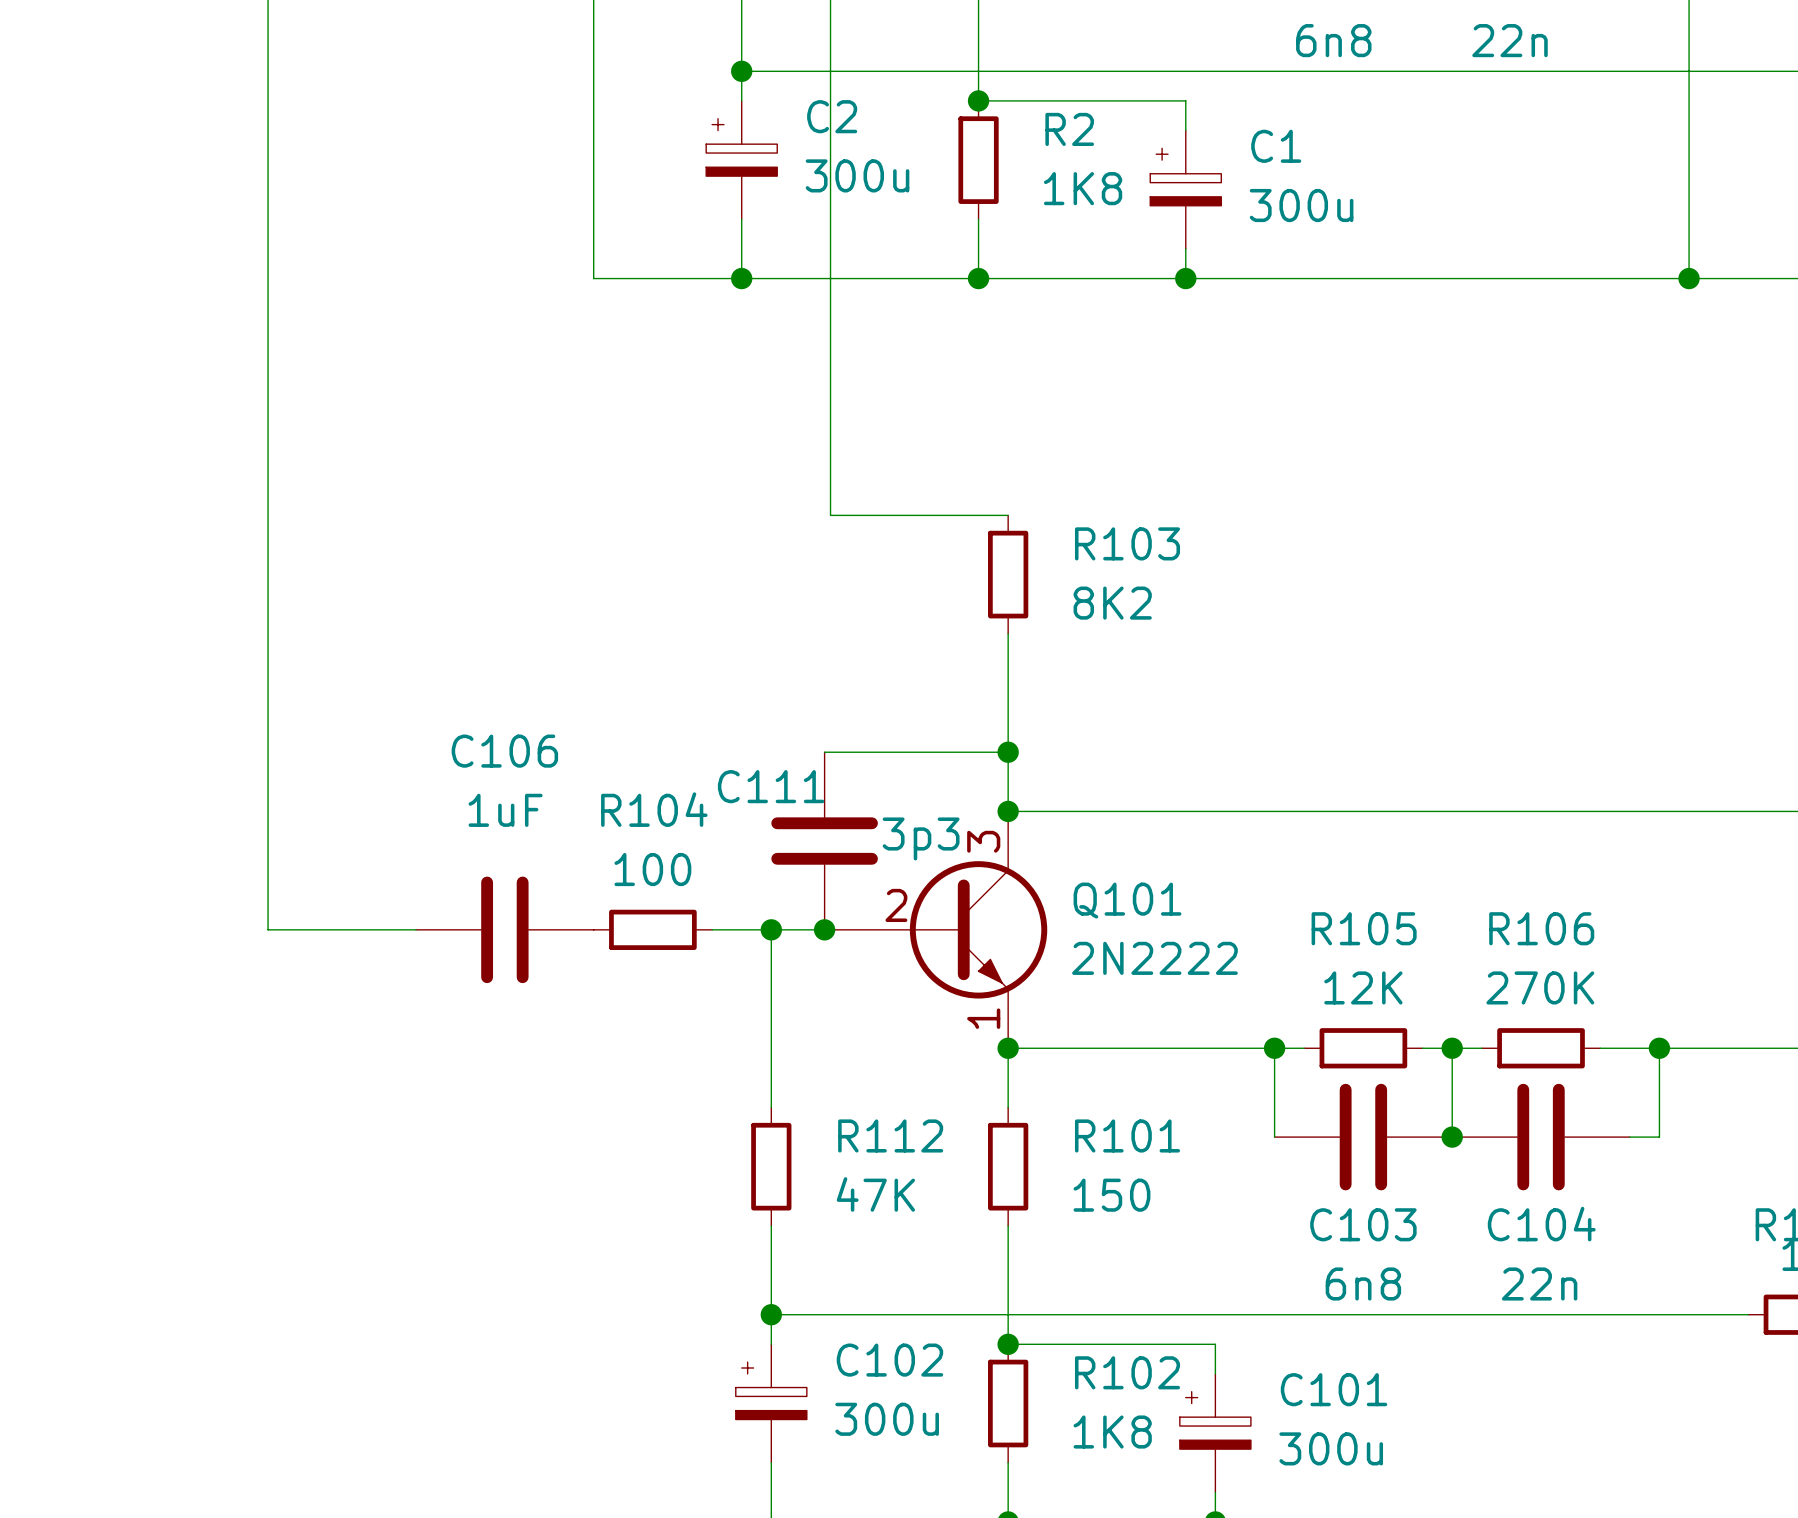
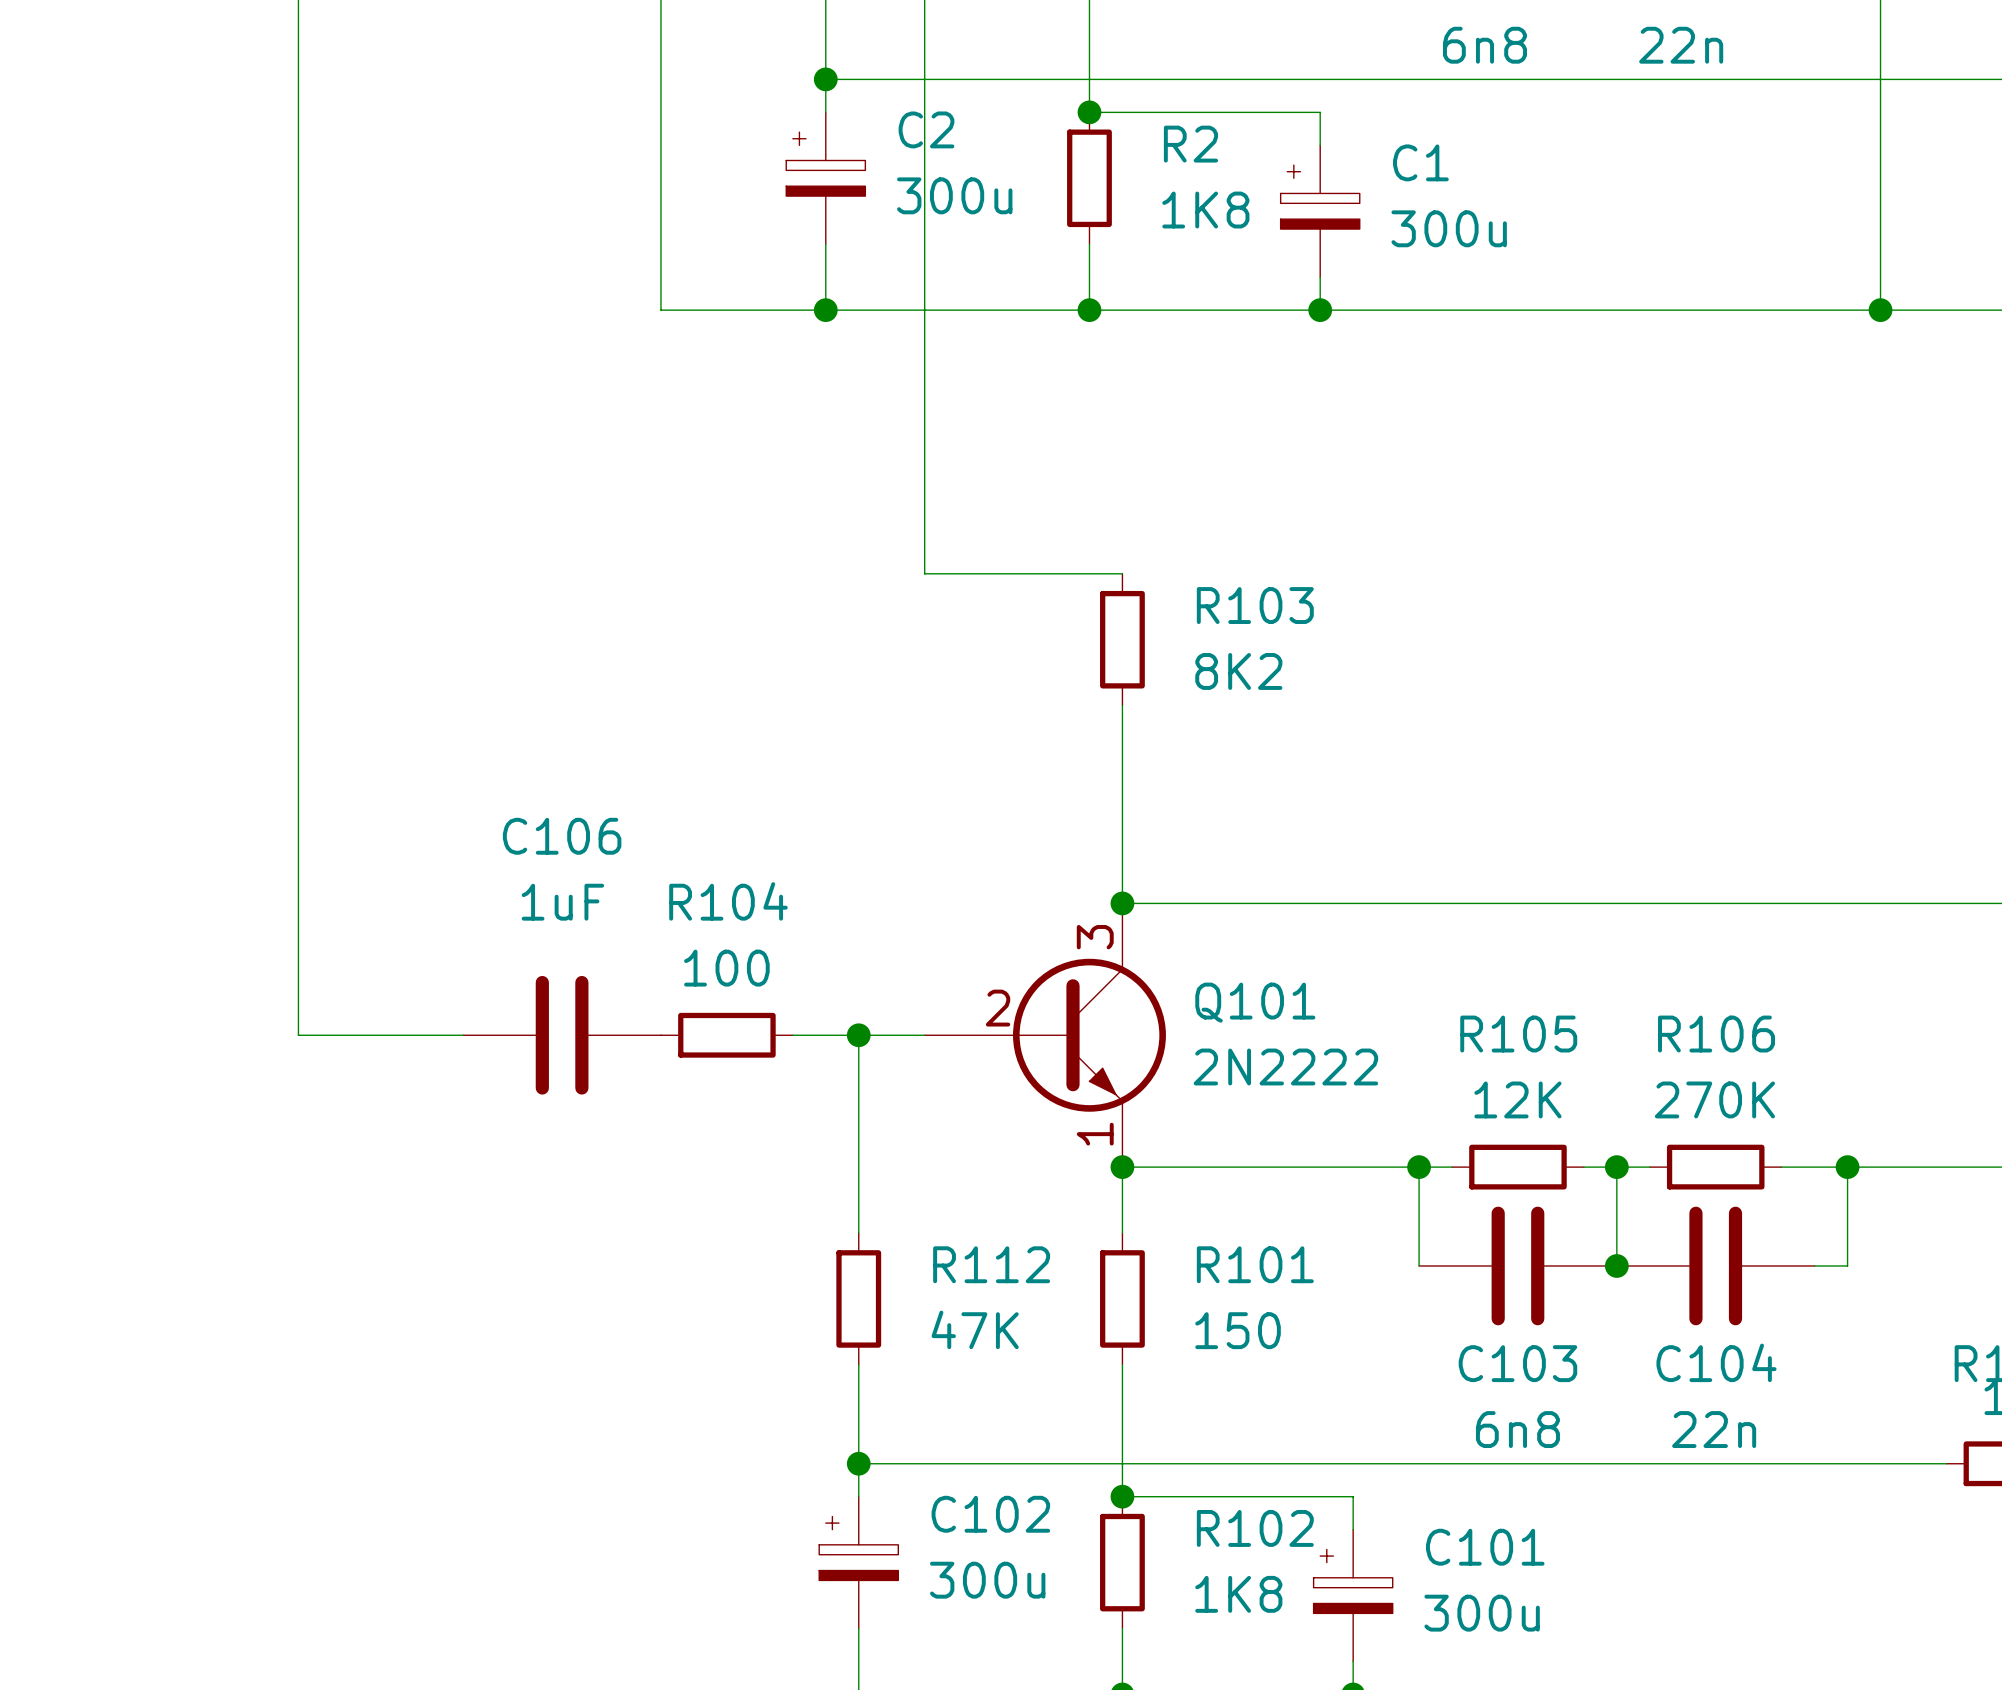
wire: (824, 752) (1008, 752) -> none
junction: (1008, 752) -> none
C111: 3p3 (824, 841) -> none
junction: (824, 929) -> none

